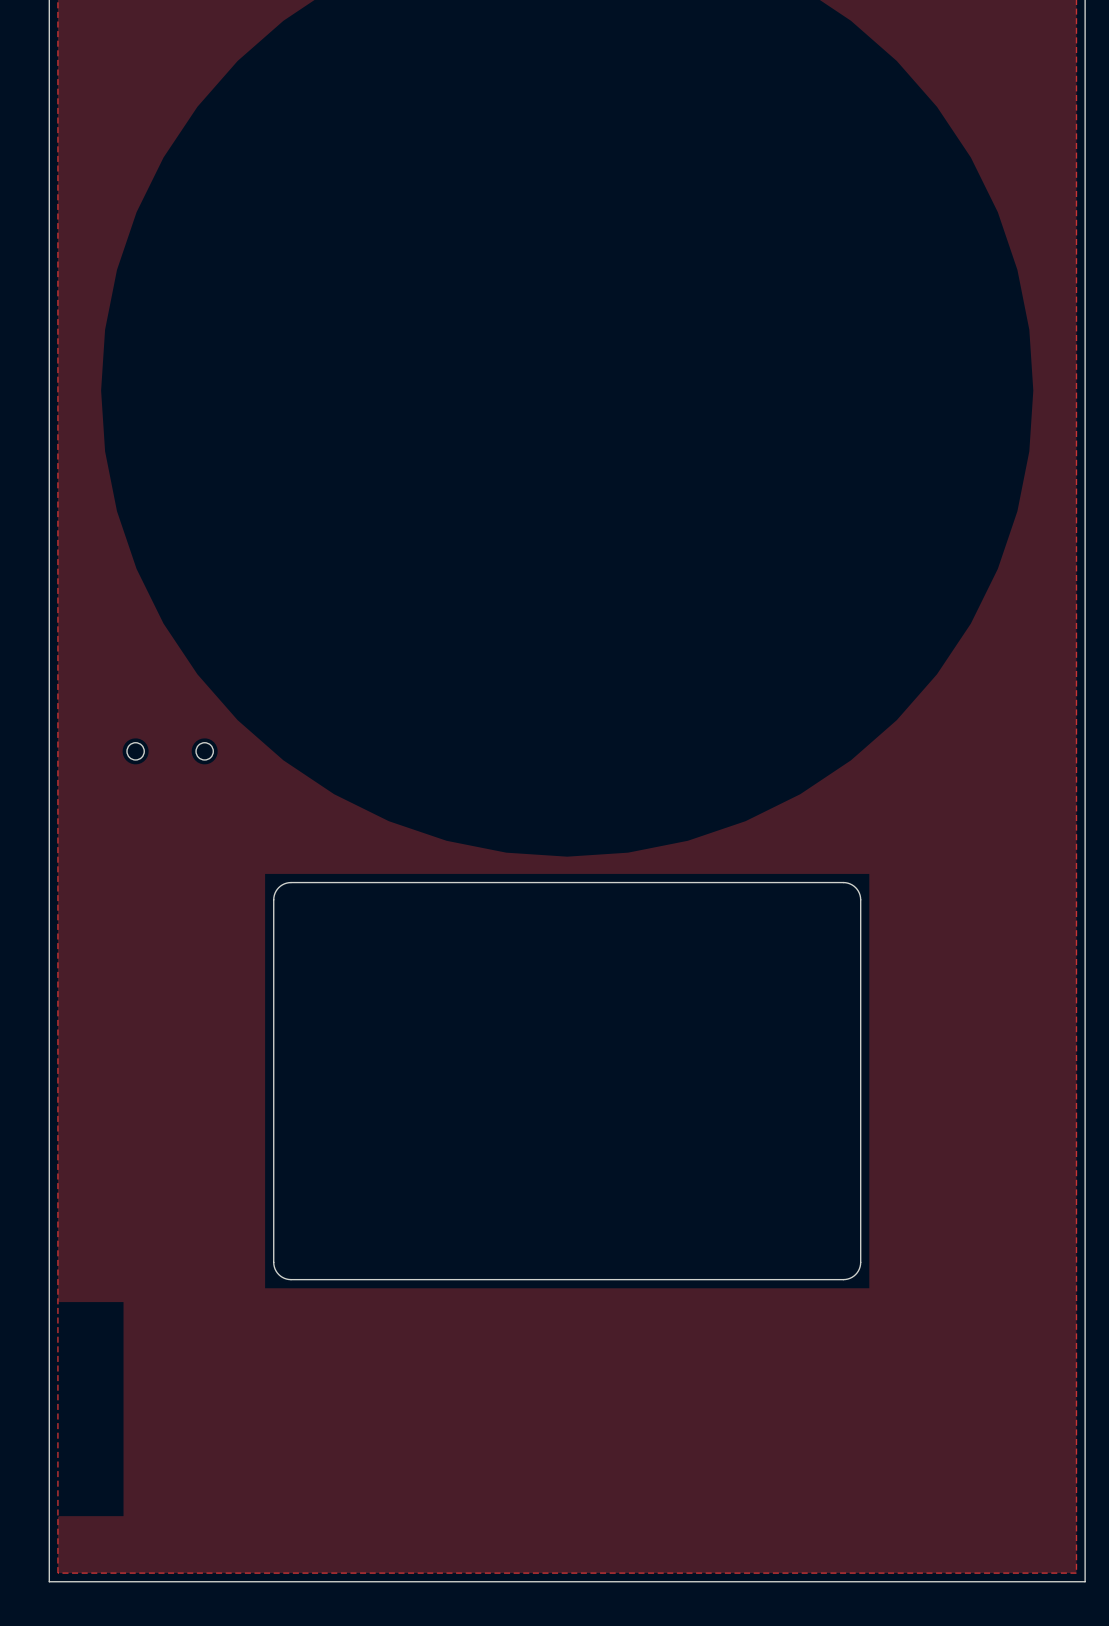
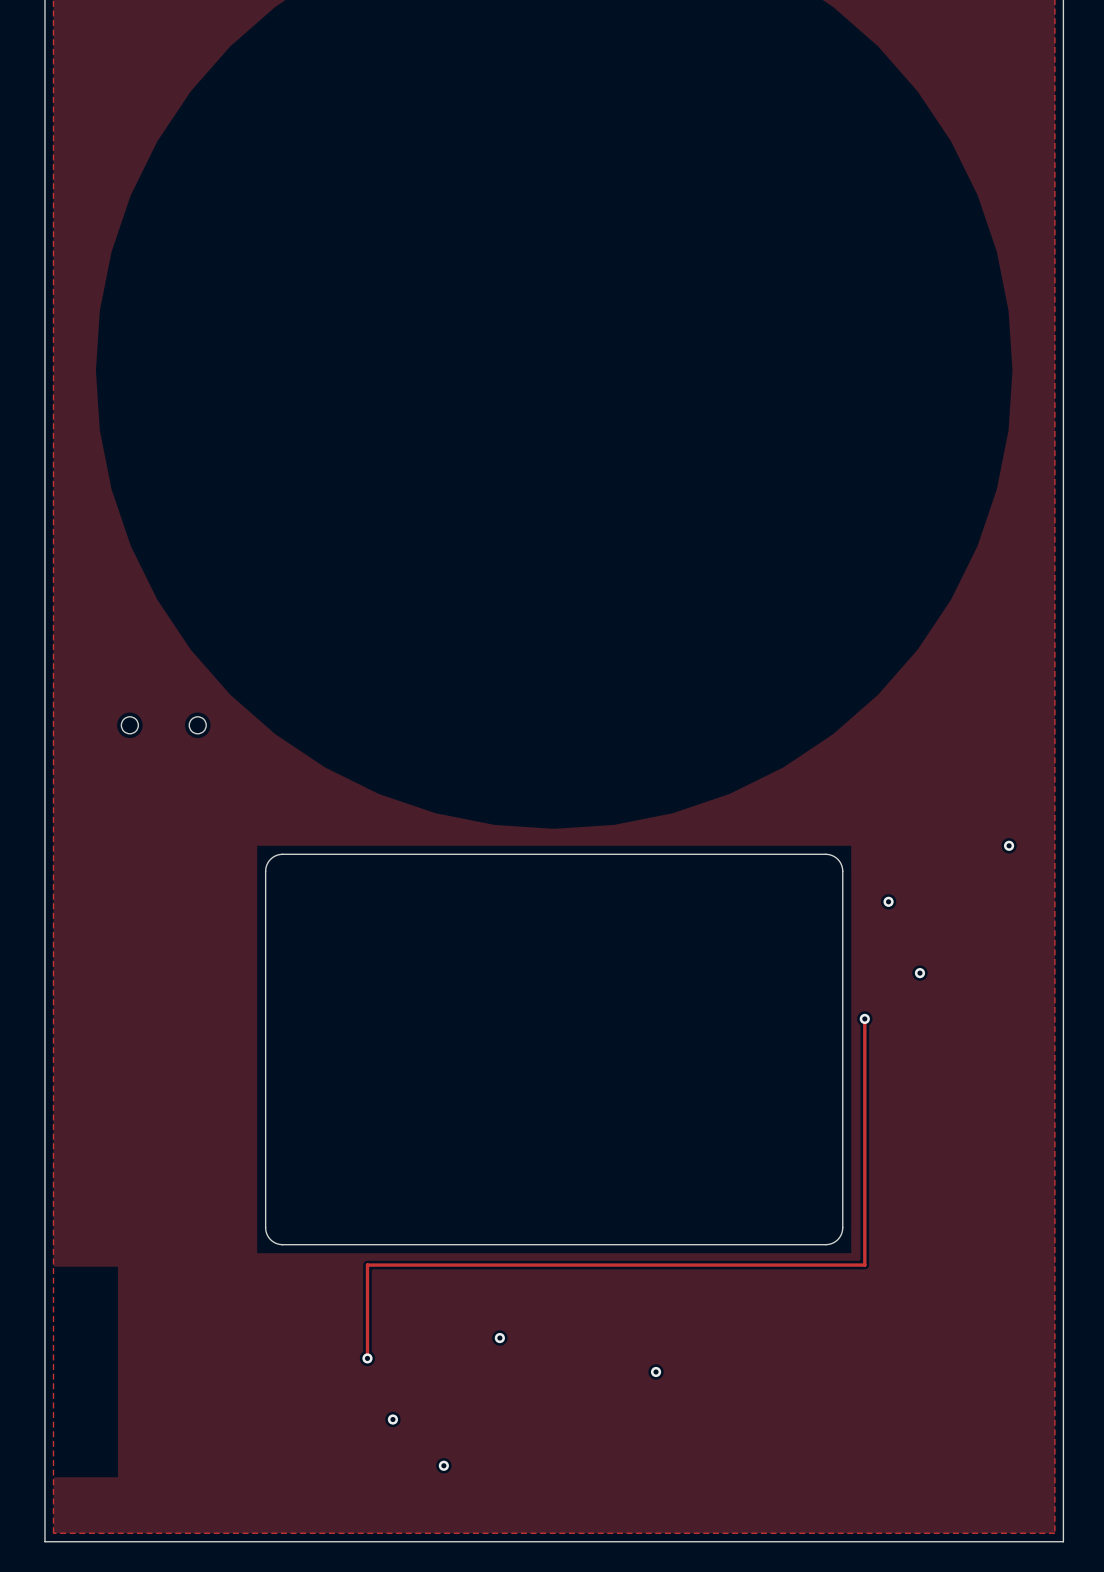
via: none -> (1009, 845)
via: none -> (888, 901)
via: none -> (919, 973)
track: none -> (864, 1018) (864, 1265) (367, 1265) (367, 1358)
via: none -> (864, 1018)
via: none -> (499, 1338)
via: none -> (367, 1358)
via: none -> (656, 1371)
via: none -> (392, 1419)
via: none -> (443, 1465)

